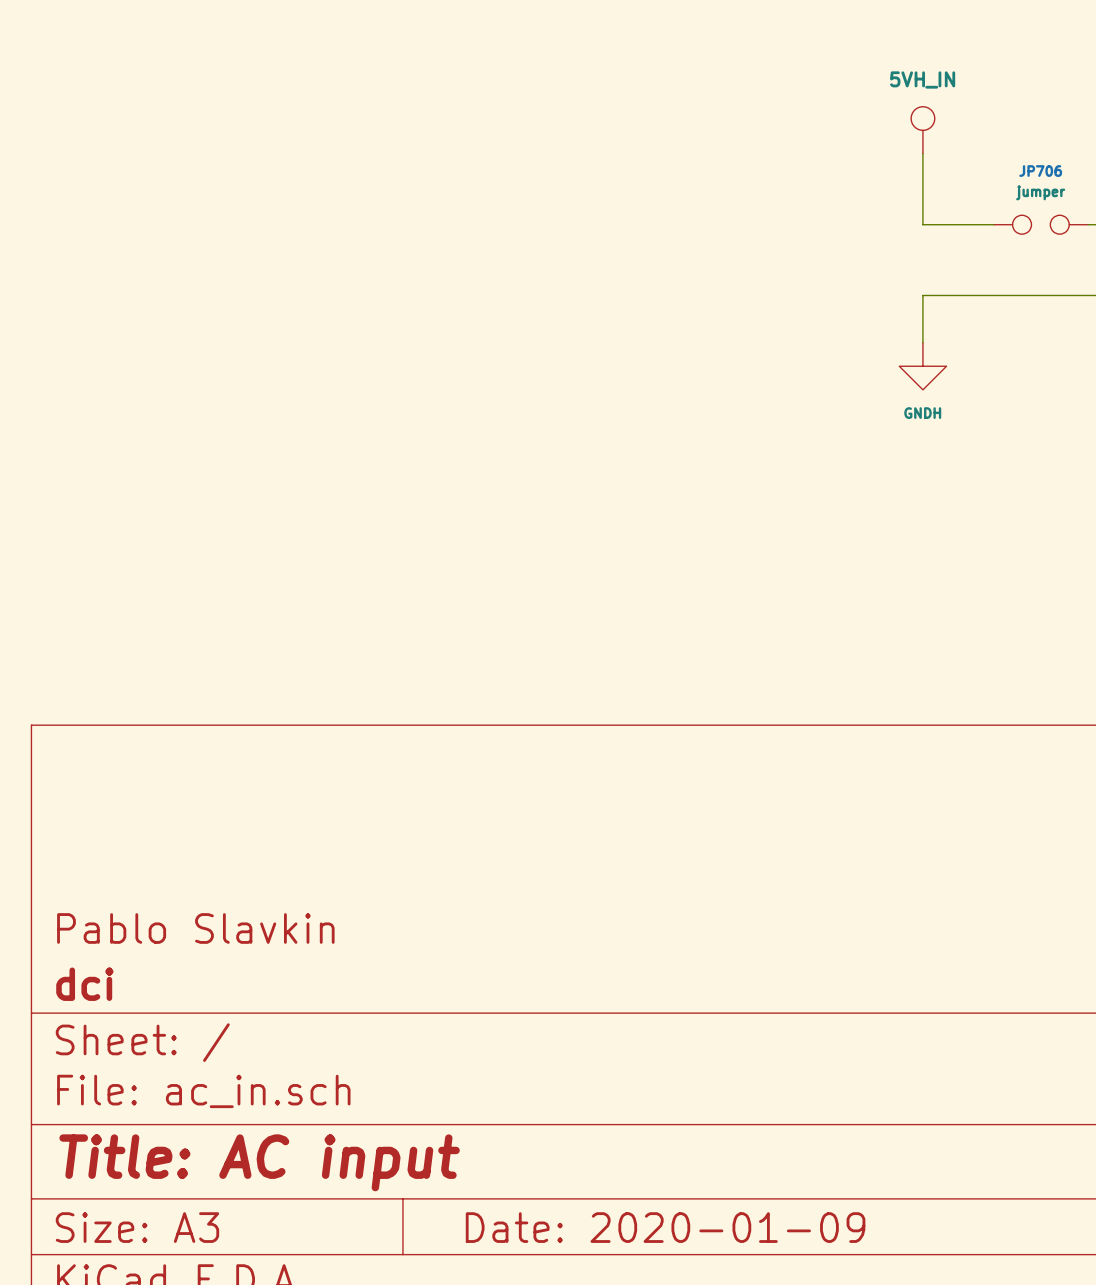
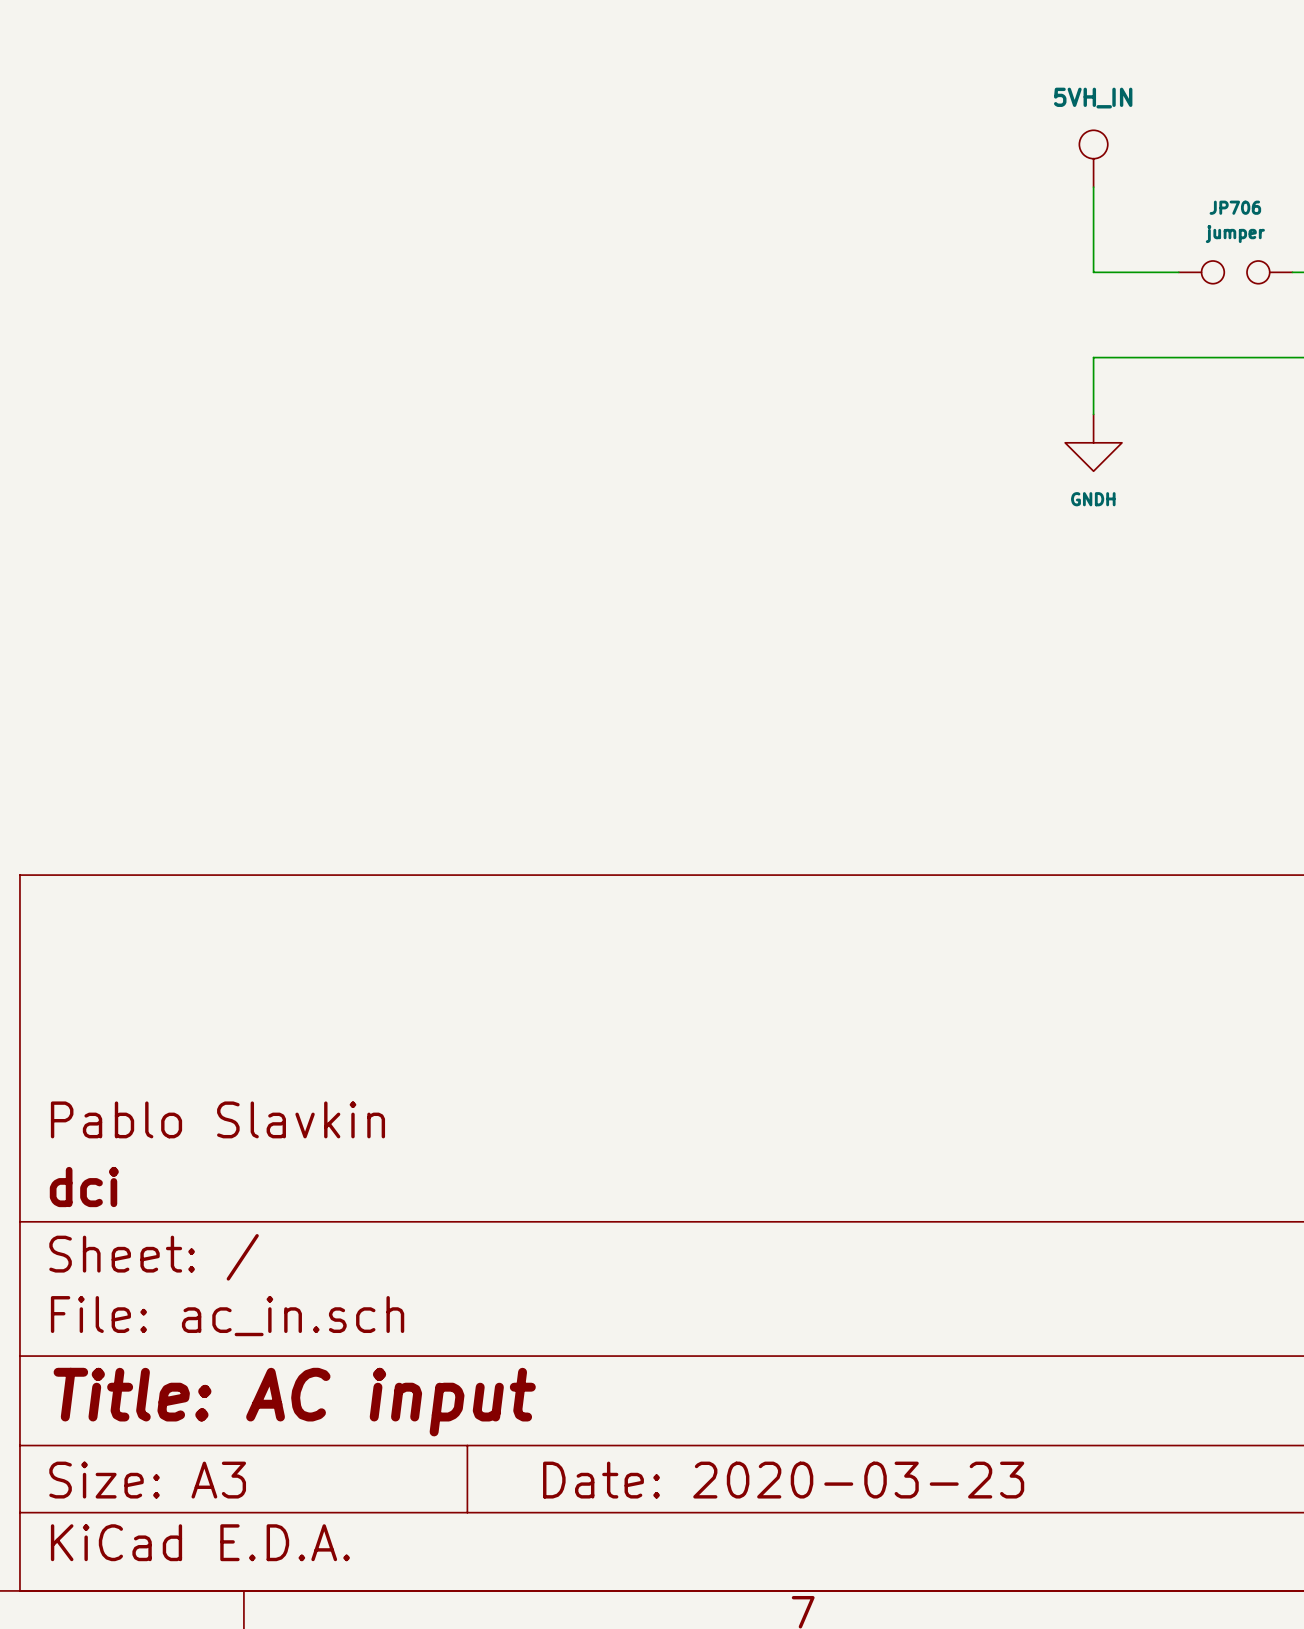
title block: Date: 2020-01-09 (665, 1227) -> Date: 2020-03-23 (783, 1480)

